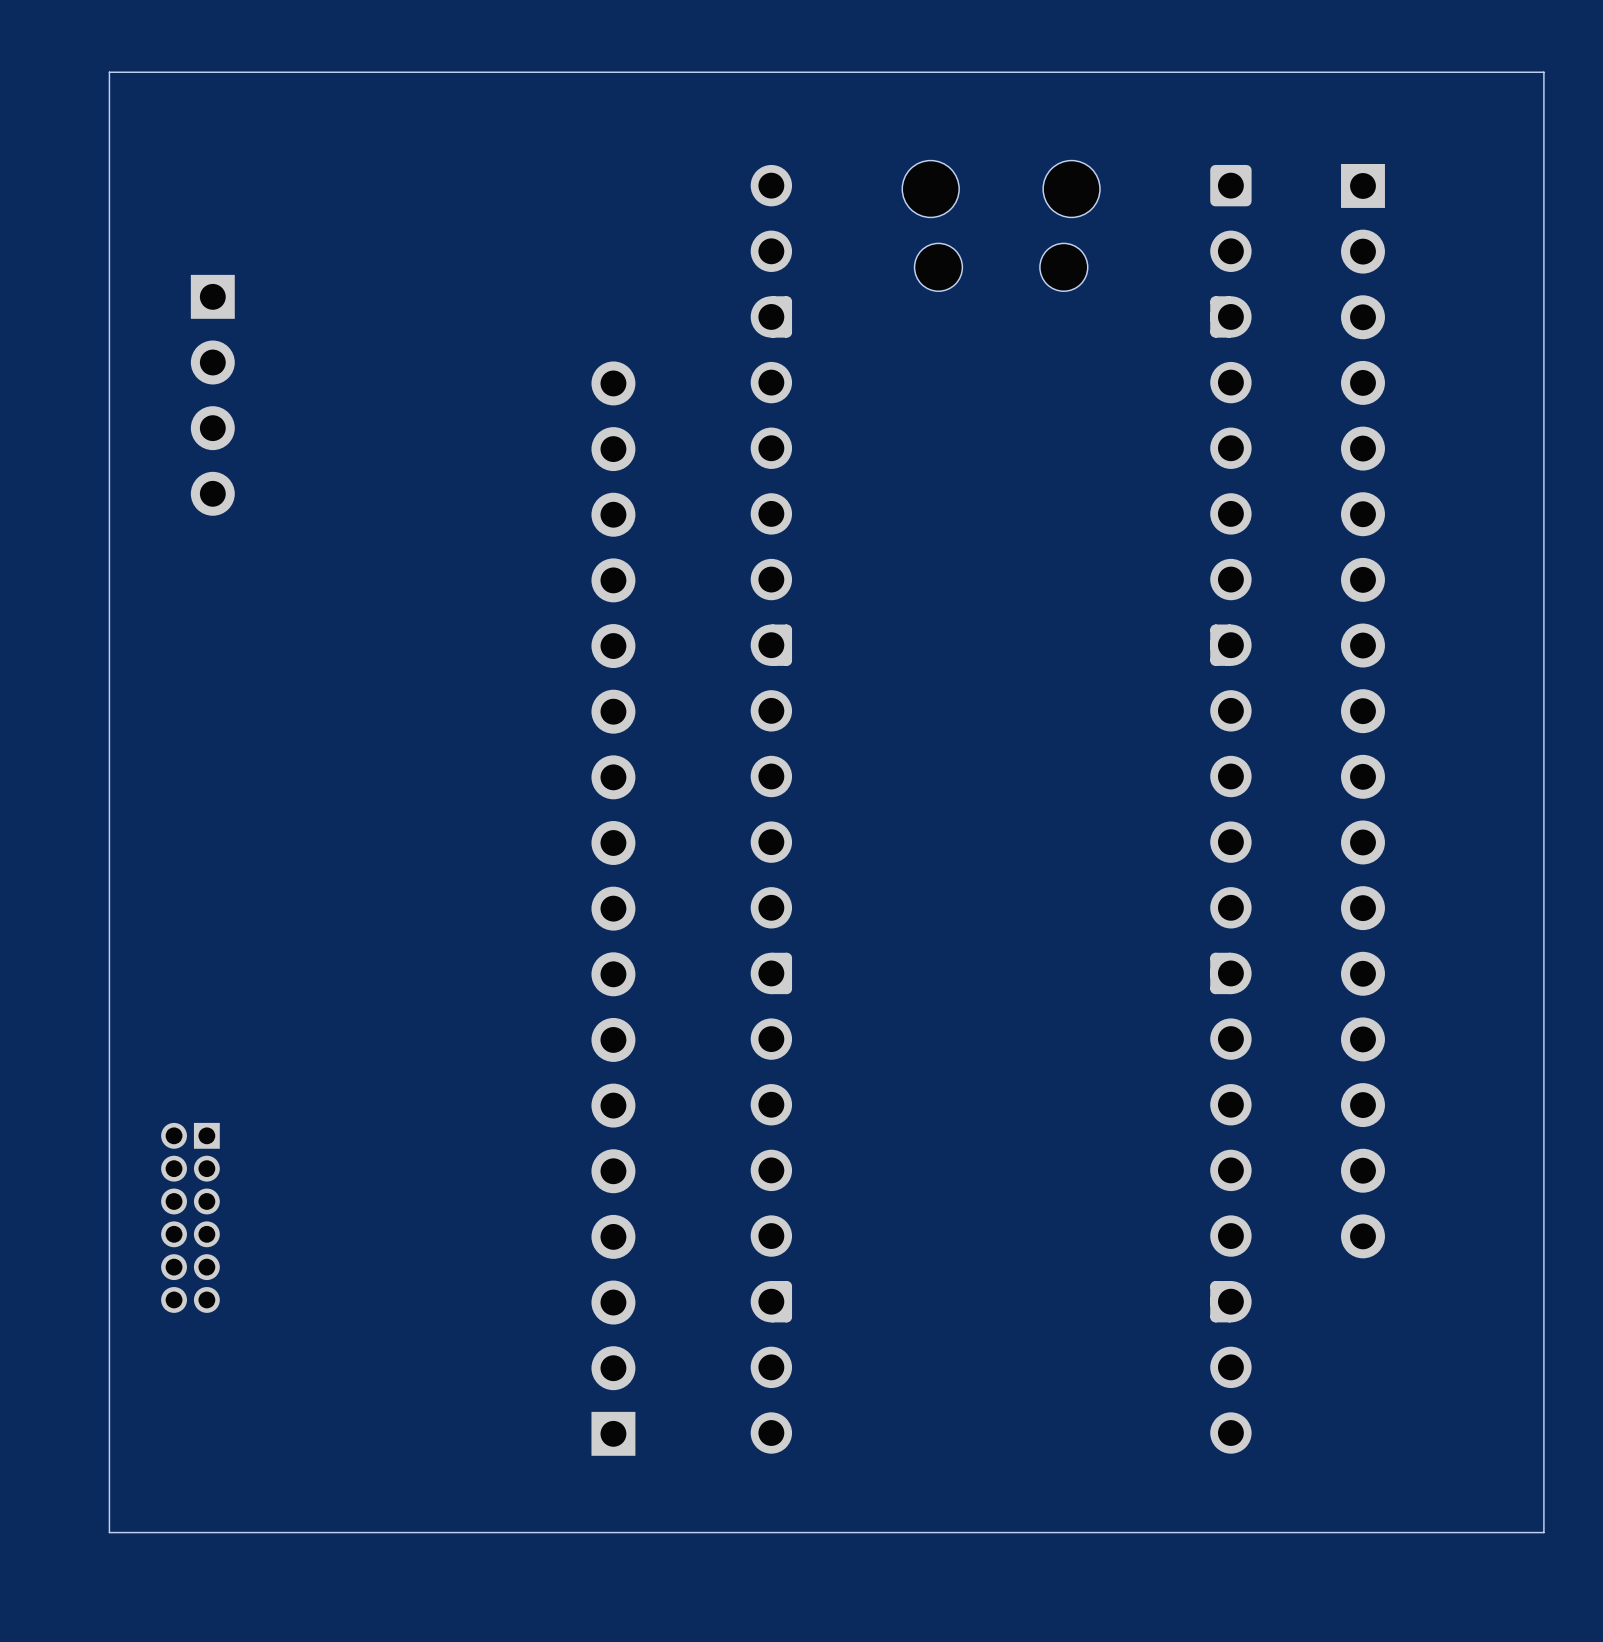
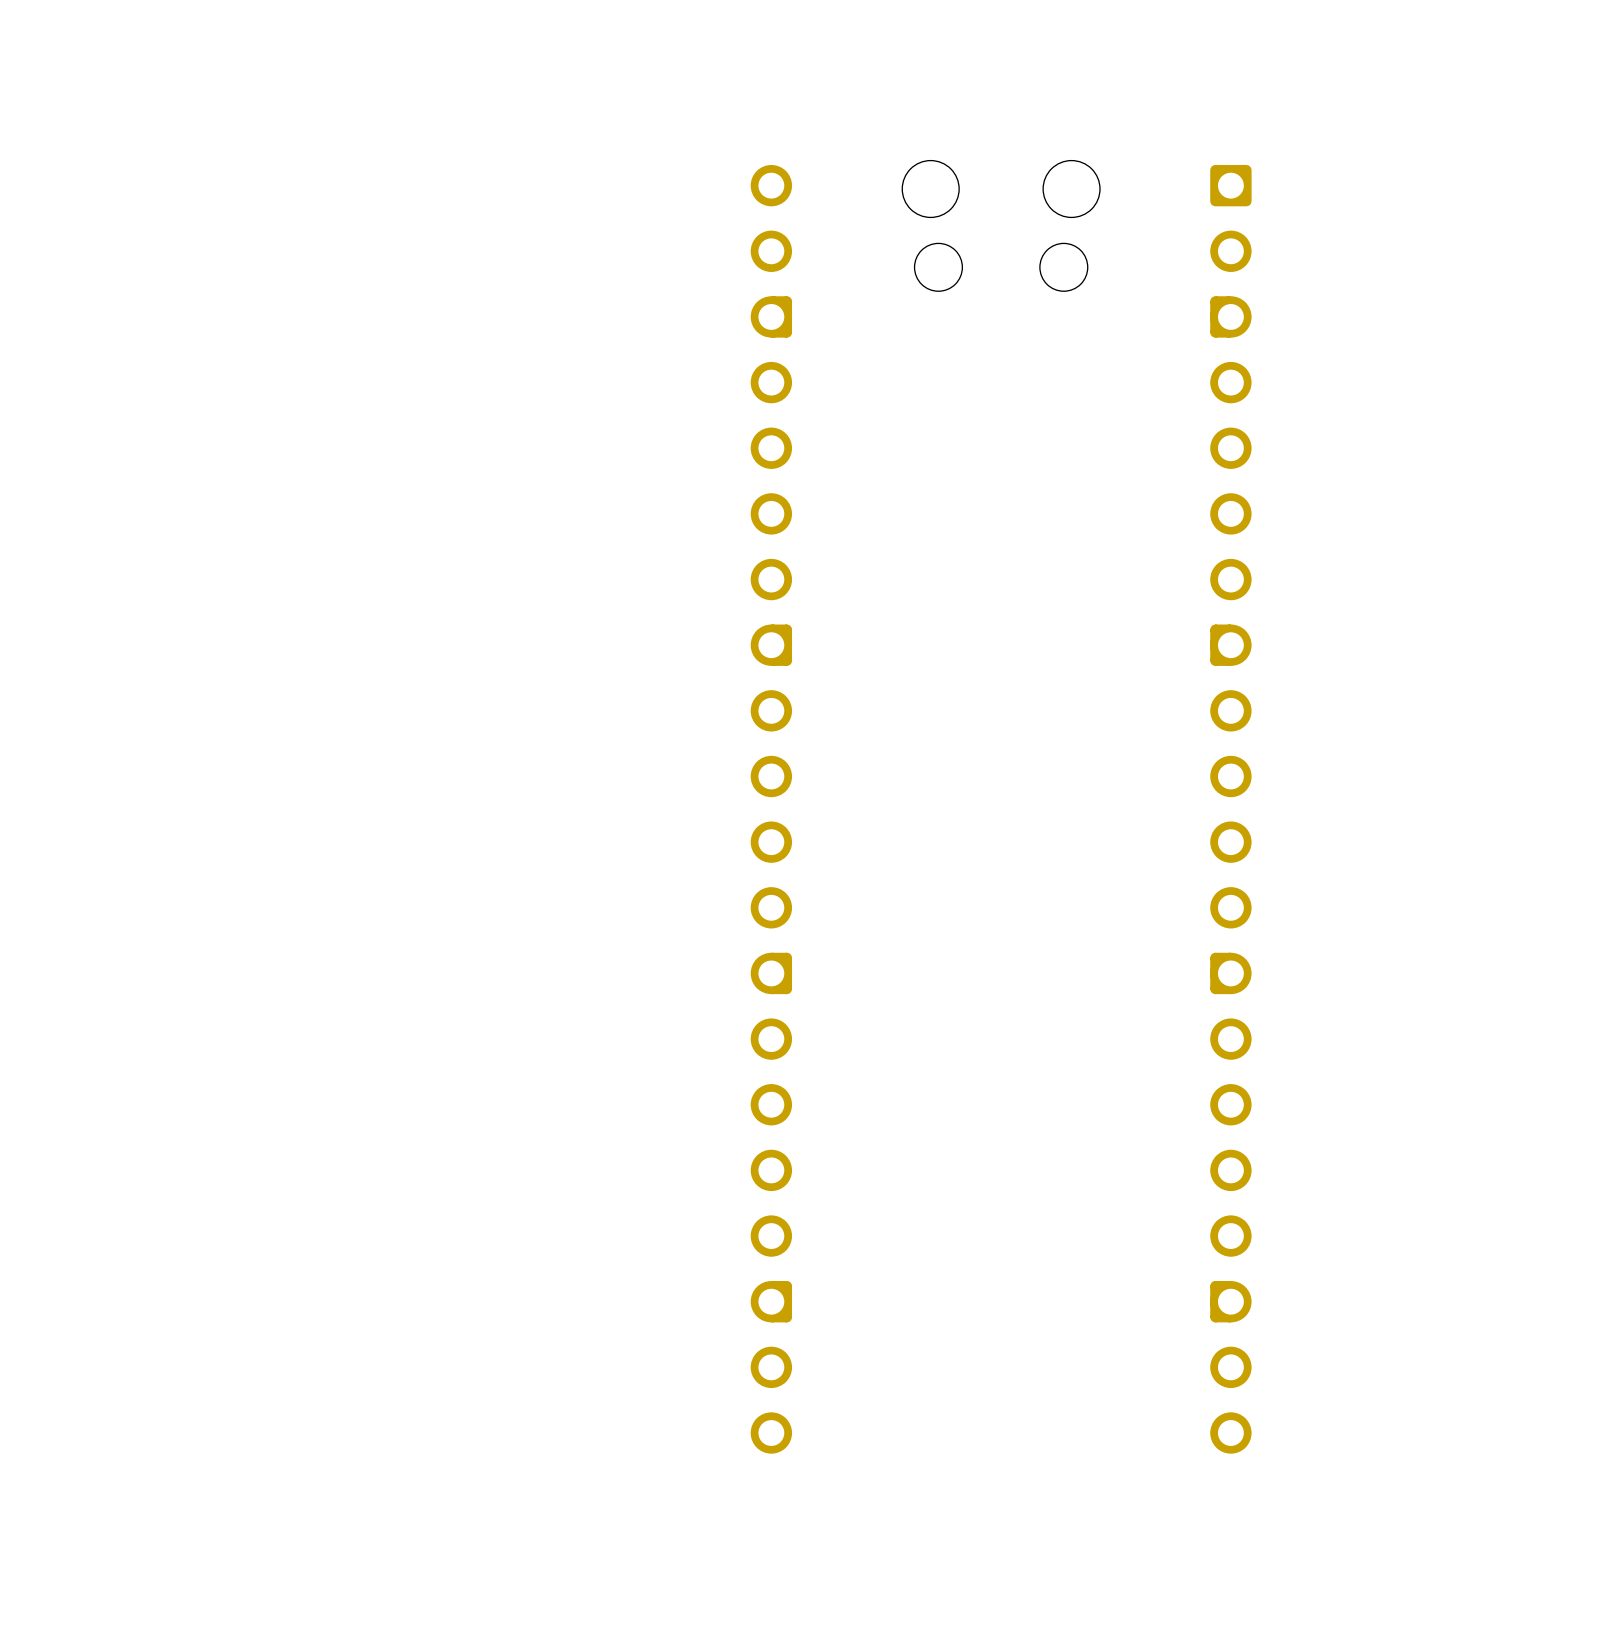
board edge: (1543, 72) (109, 72) (109, 1532) (1543, 1532) (1543, 72) -> none
part: (212, 395) -> none
part: (1362, 711) -> none
part: (613, 908) -> none
part: (190, 1217) -> none

